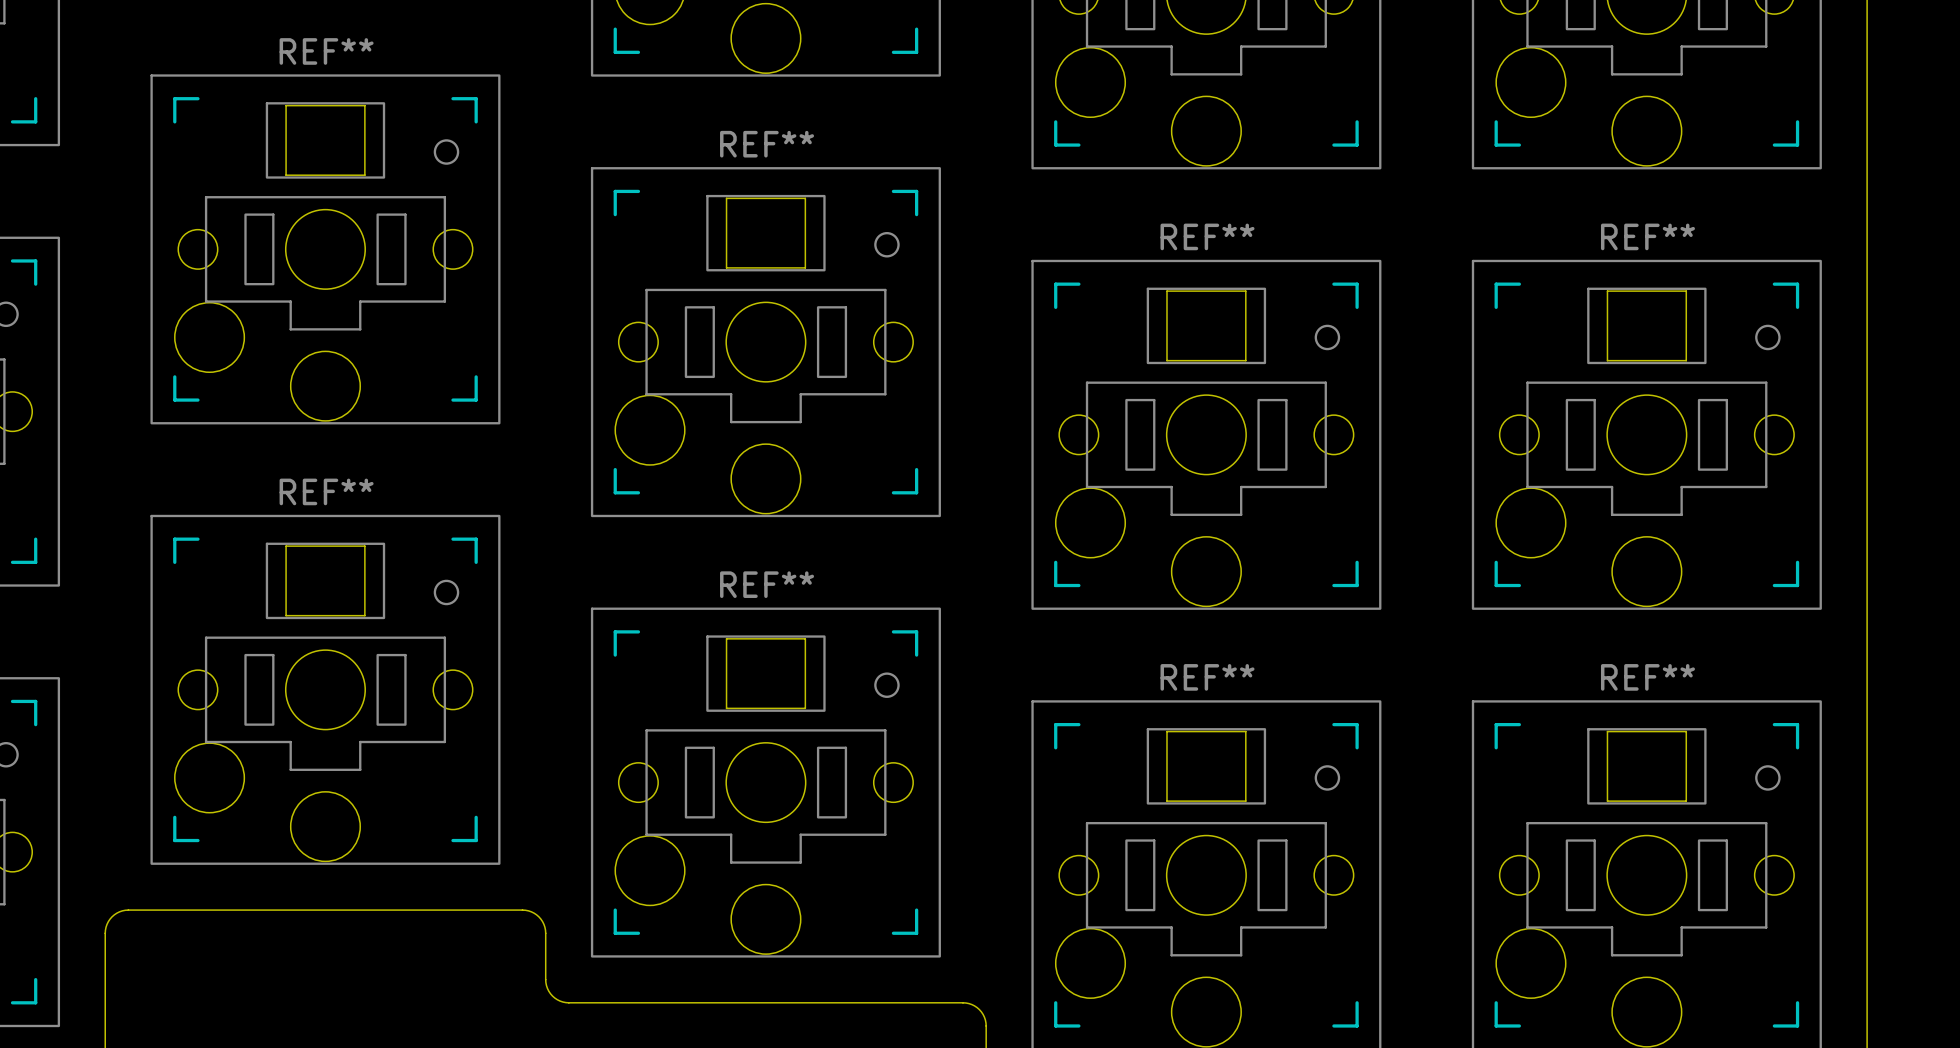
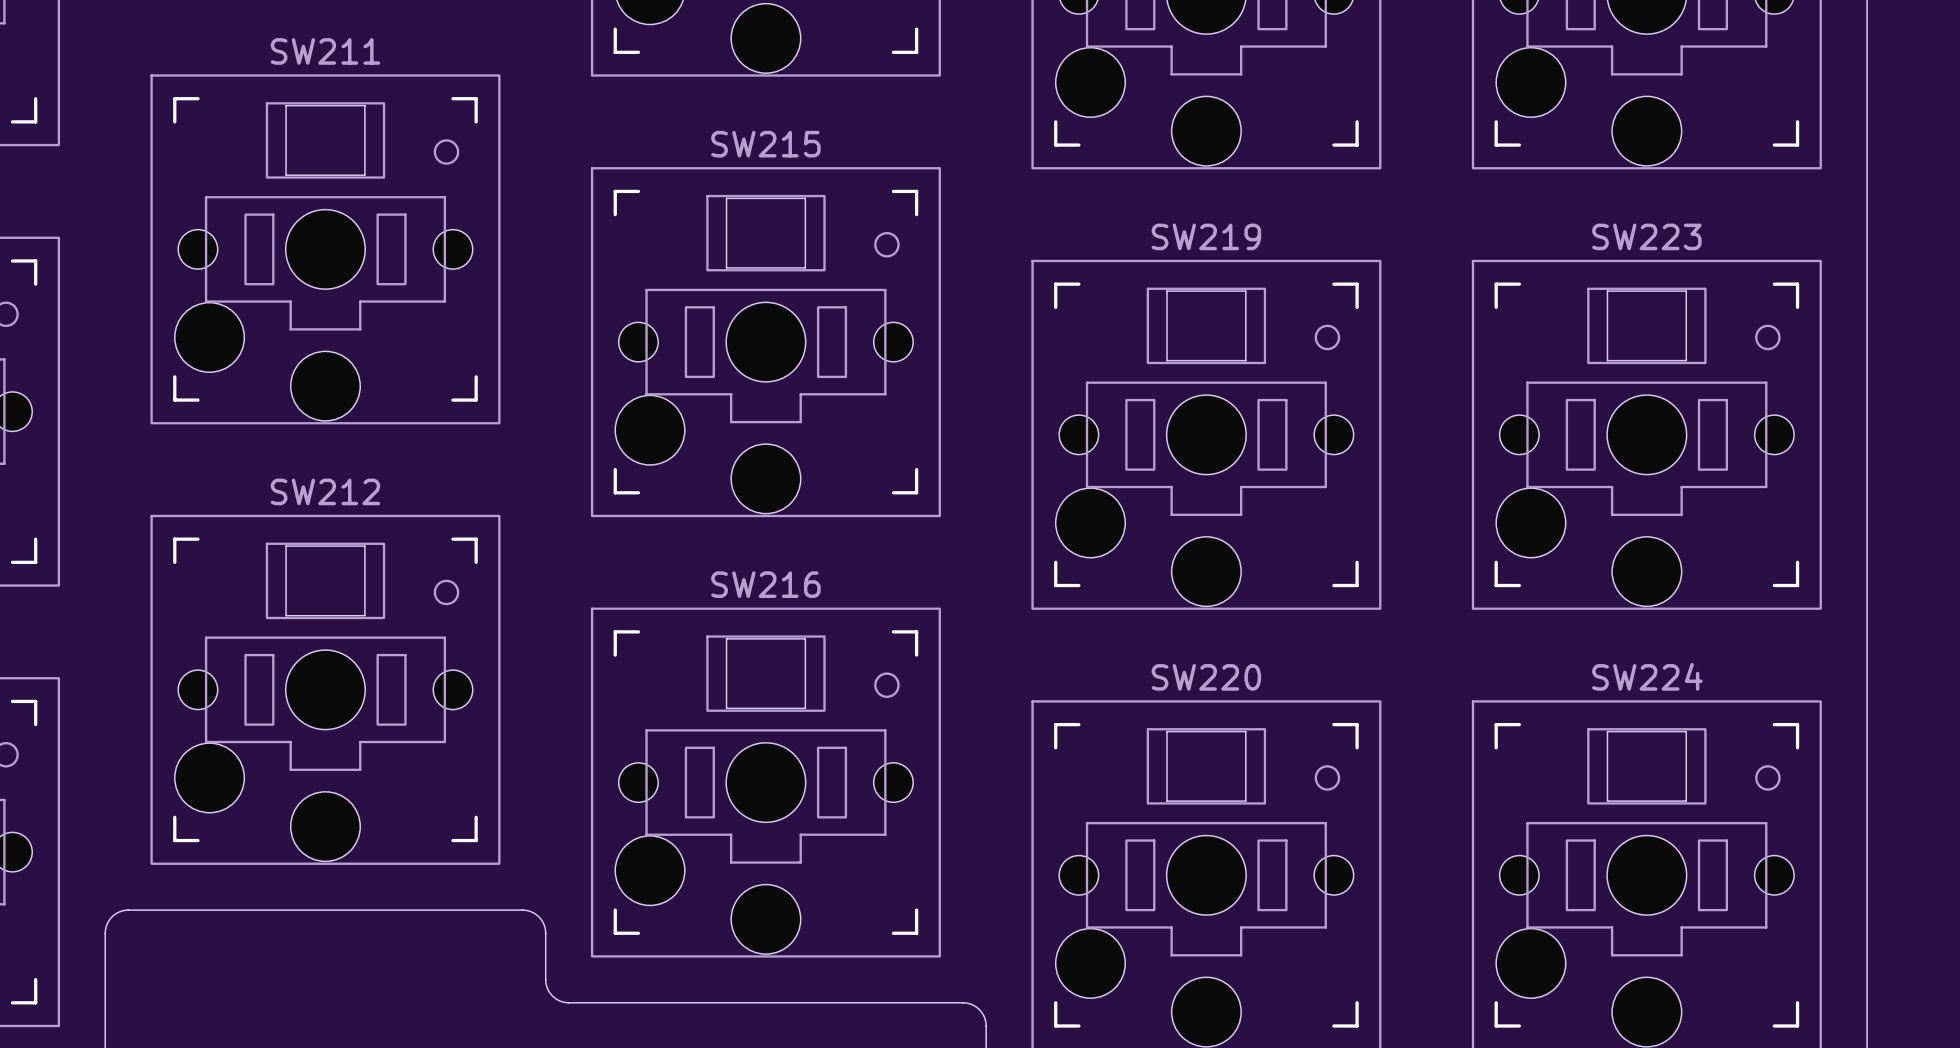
REF** name: REF** (326, 51) -> SW211 (325, 51)
REF** name: REF** (767, 144) -> SW215 (765, 144)
REF** name: REF** (1207, 236) -> SW219 (1206, 236)
REF** name: REF** (1647, 236) -> SW223 (1646, 236)
REF** name: REF** (326, 491) -> SW212 (325, 491)
REF** name: REF** (767, 584) -> SW216 (765, 584)
REF** name: REF** (1207, 677) -> SW220 (1206, 677)
REF** name: REF** (1647, 677) -> SW224 (1647, 676)

